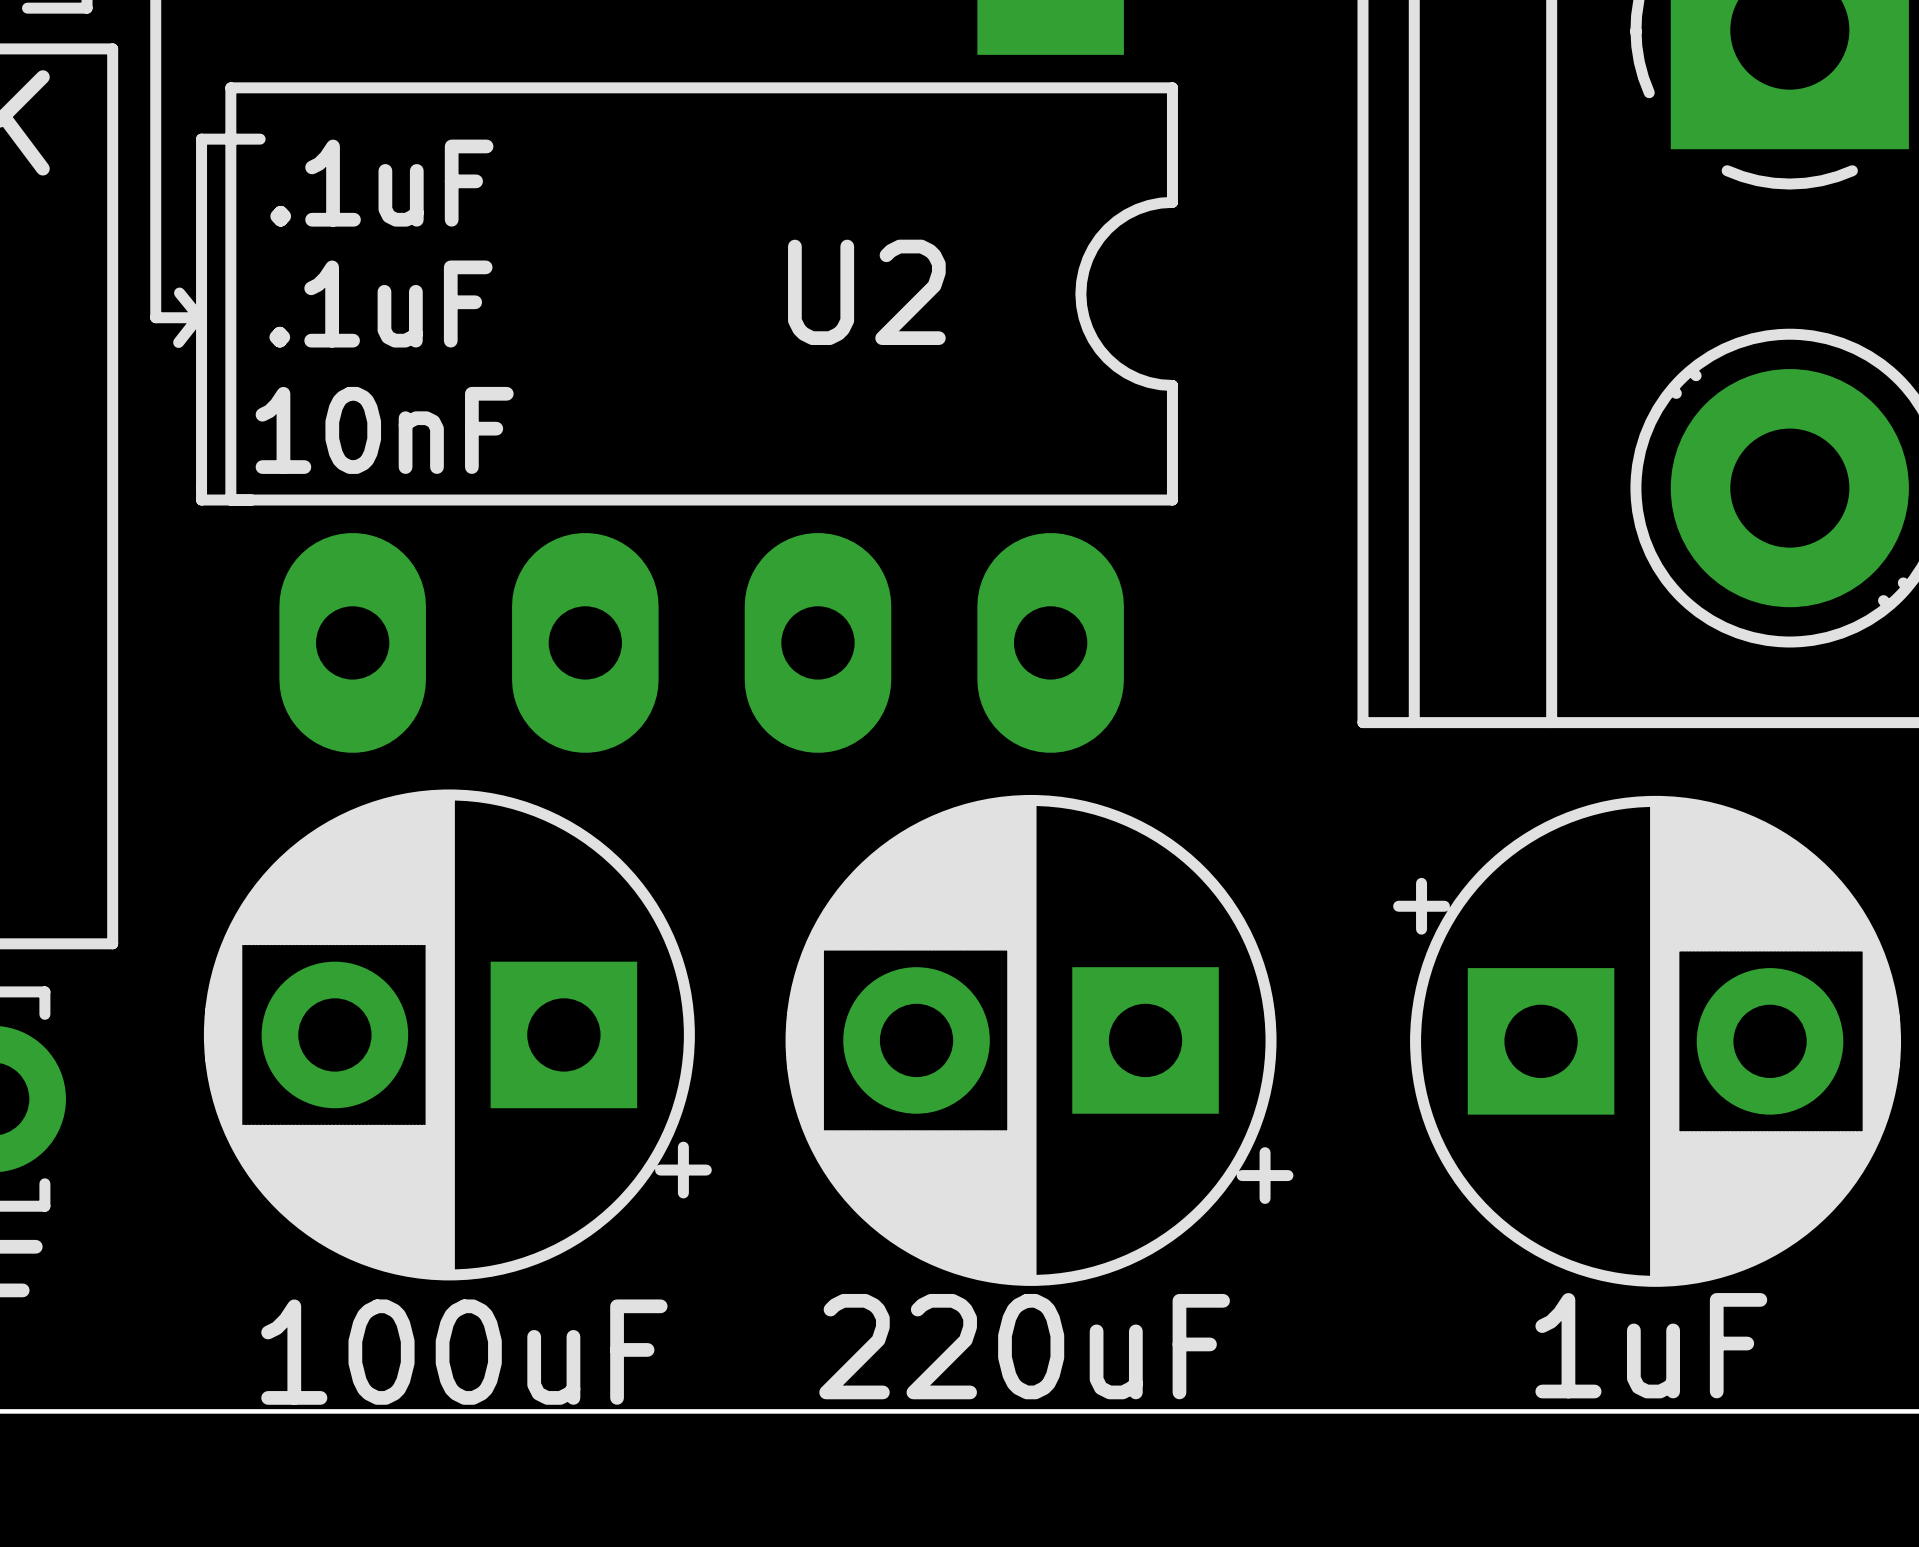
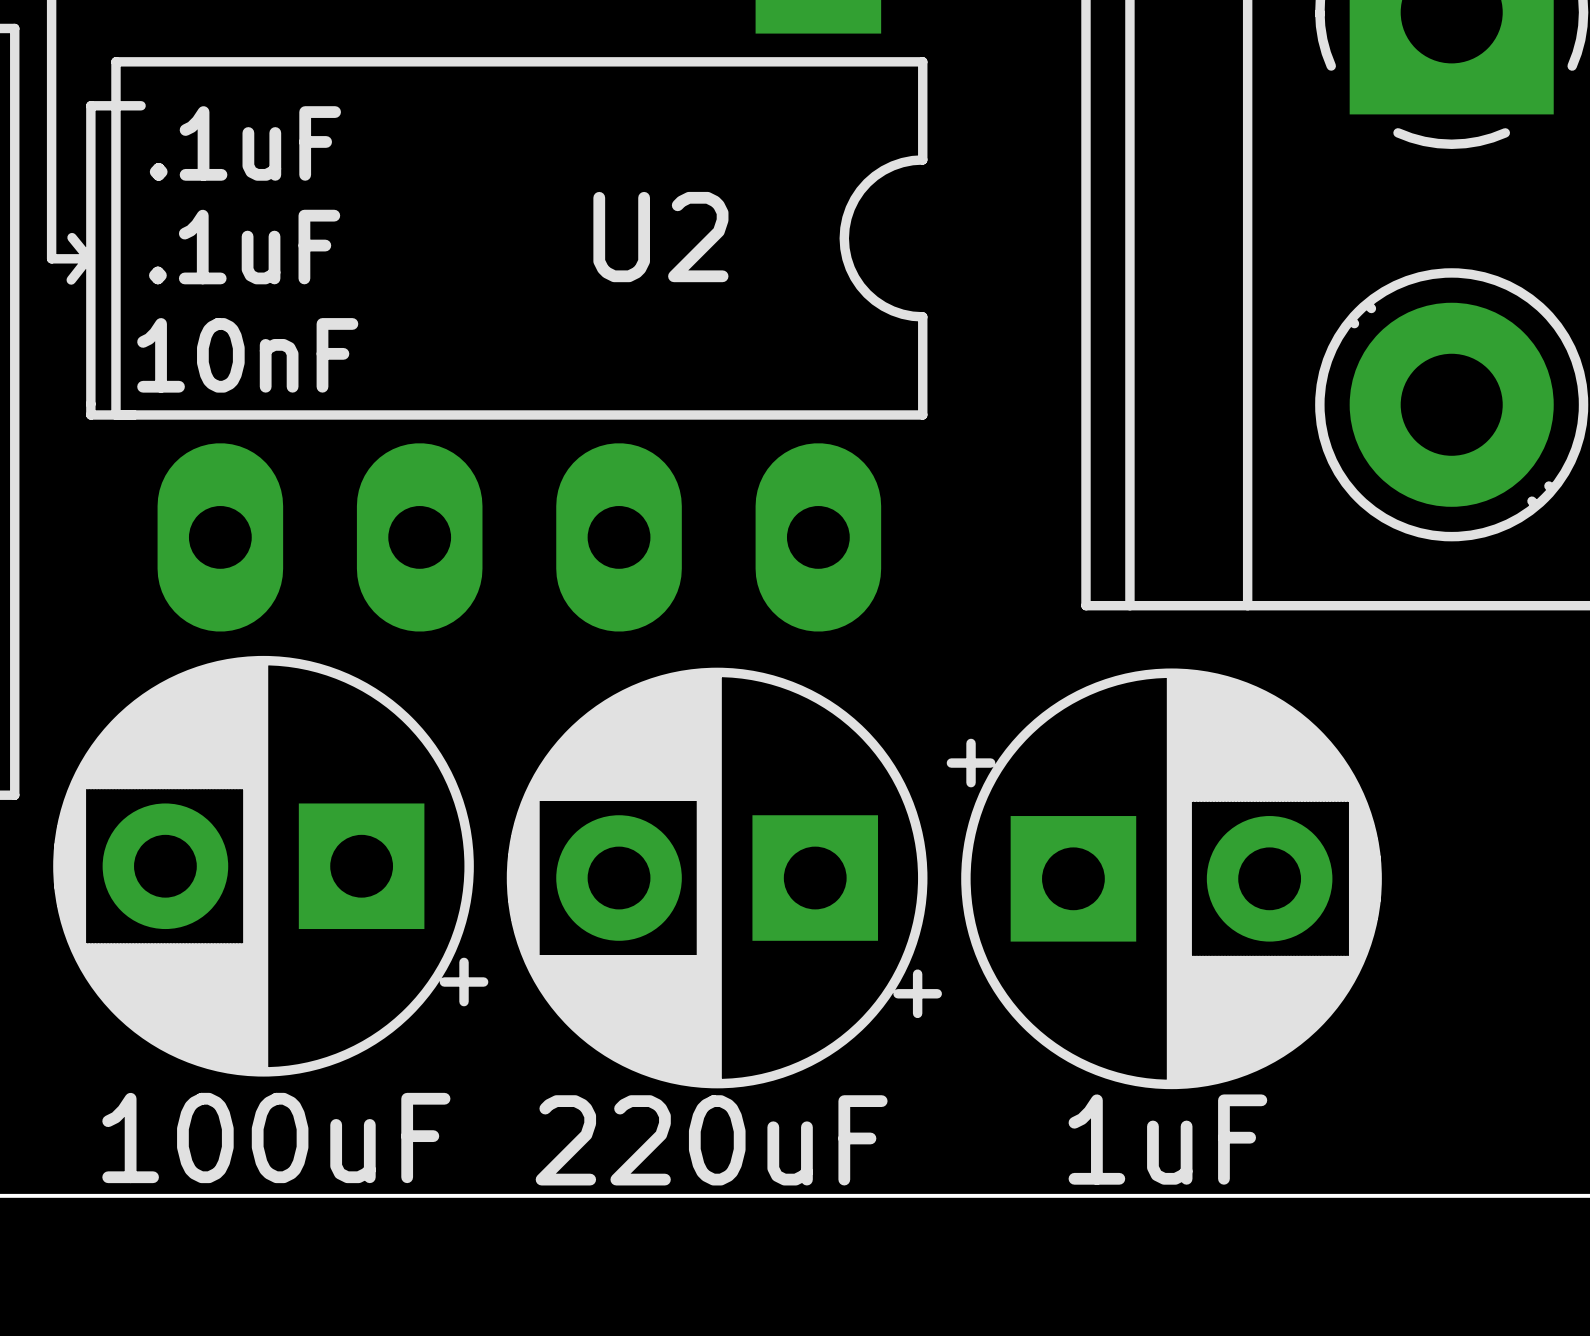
part position: (457, 1034) -> (270, 866)
part position: (1039, 1040) -> (724, 878)
part position: (1647, 1041) -> (1164, 878)

